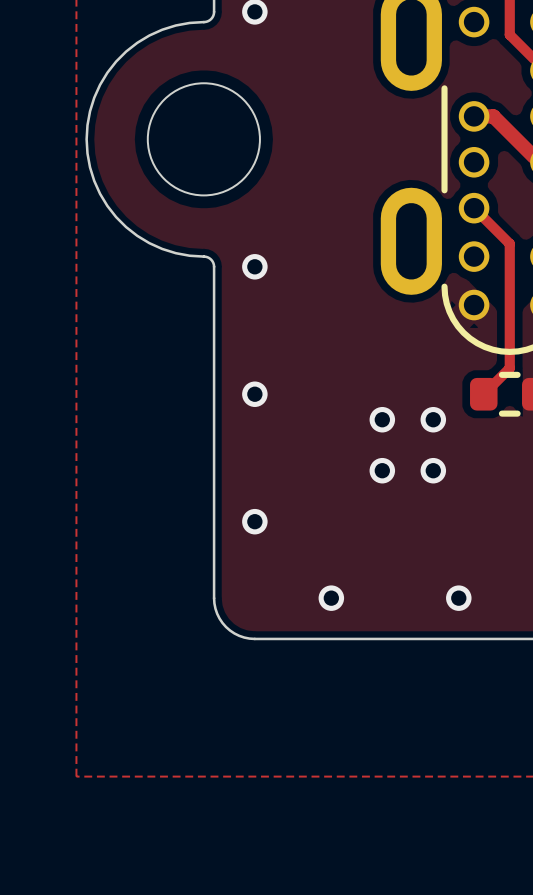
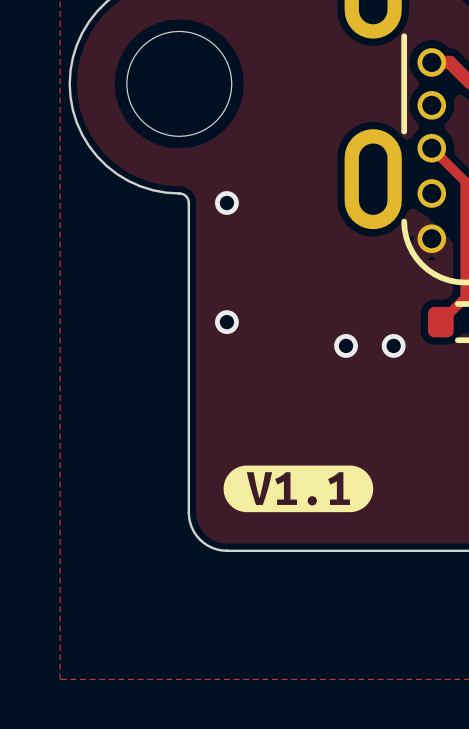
via: (382, 470) -> none
via: (433, 470) -> none
via: (254, 521) -> none
drawing: none -> [223, 465, 374, 513]
via: (331, 598) -> none
via: (458, 598) -> none

